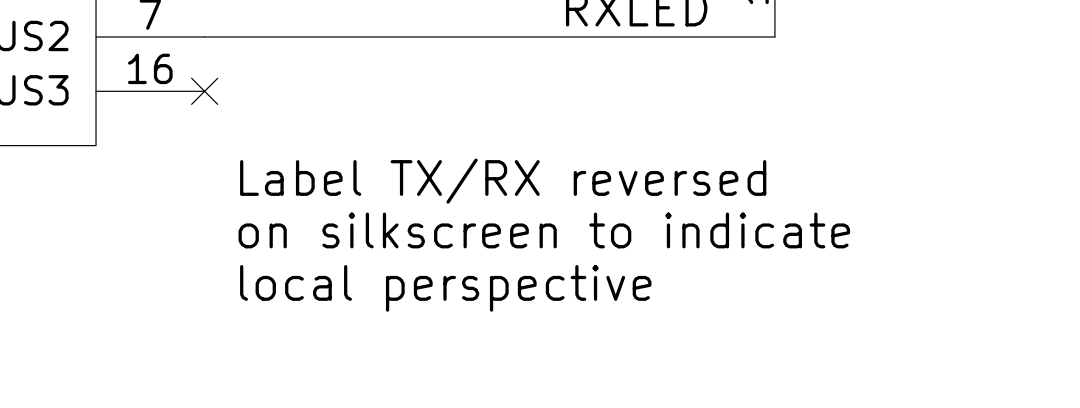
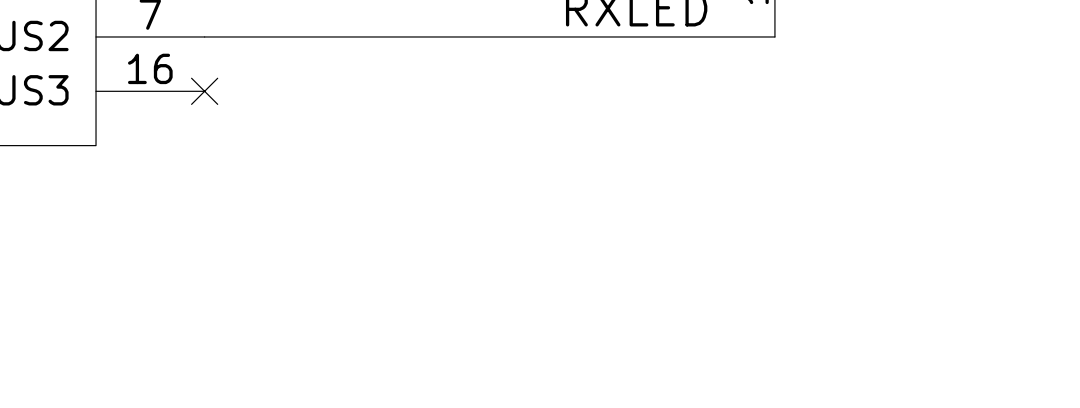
text: Label TX/RX reversed (503, 181) -> none
text: on silkscreen to indicate (544, 230) -> none
text: local perspective (445, 288) -> none

